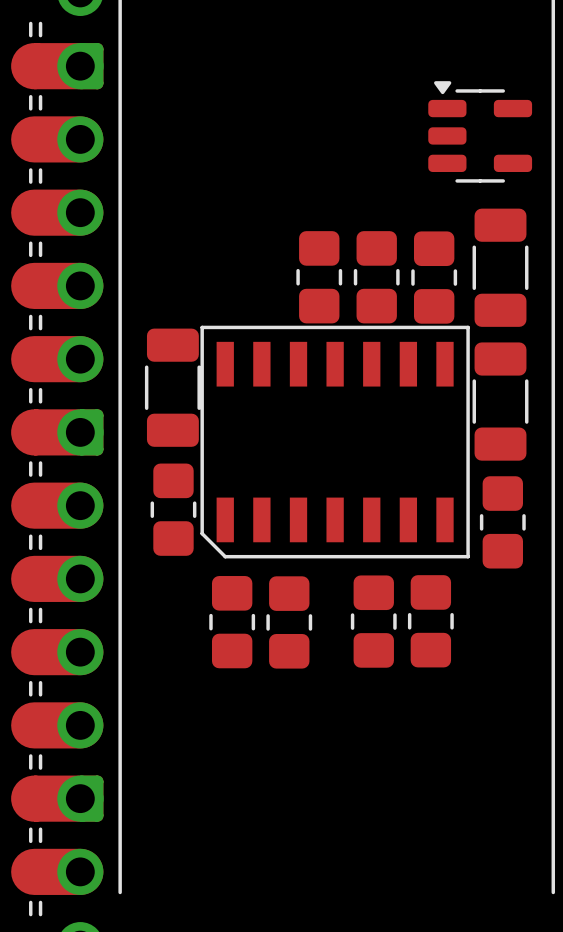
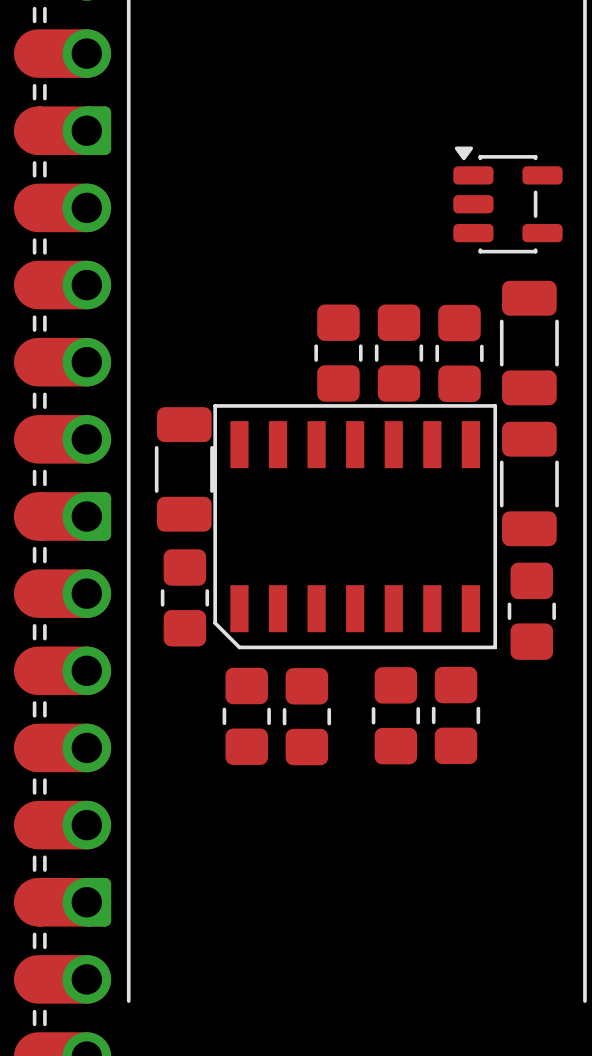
part footprint: [428, 81, 533, 183] -> [453, 146, 563, 254]

